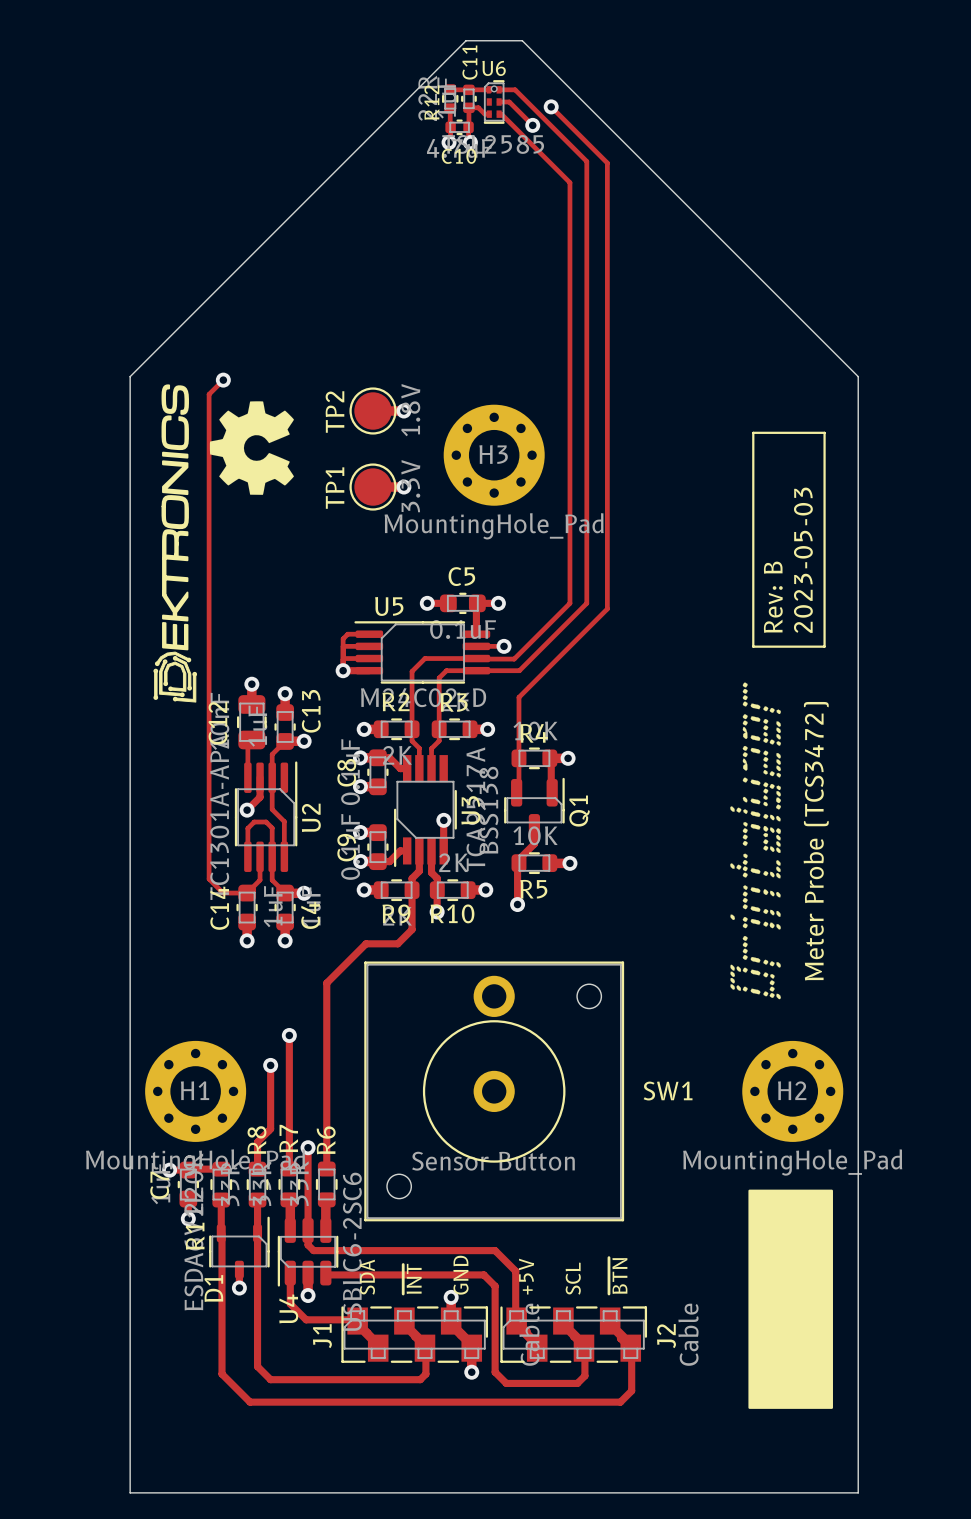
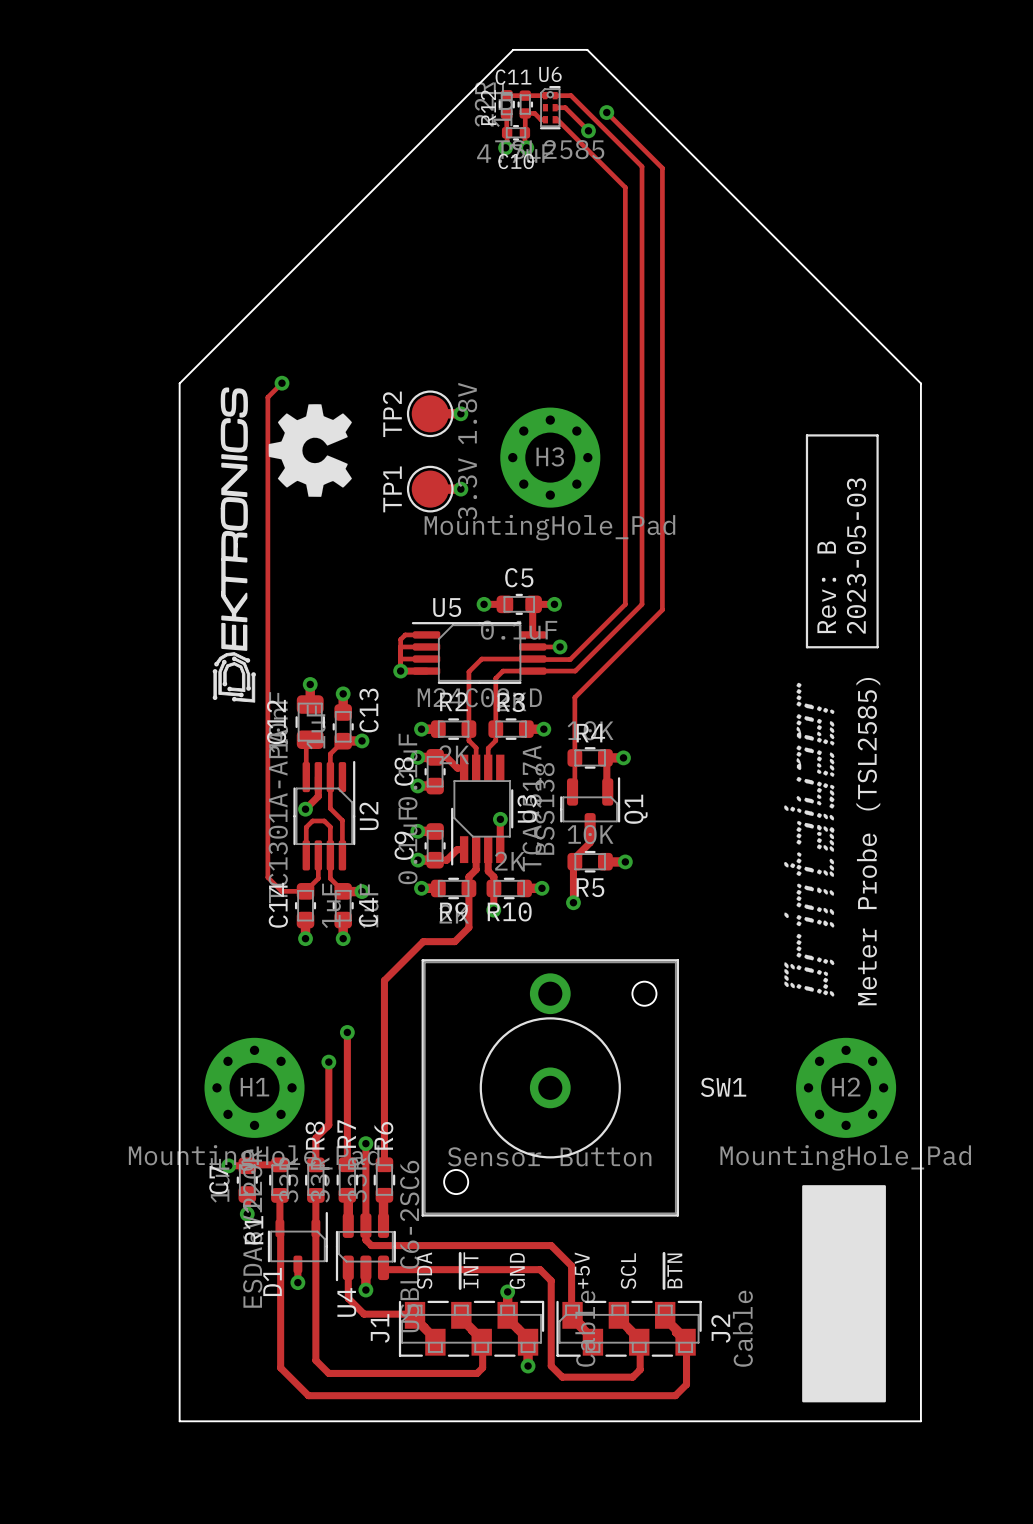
board edge: (466, 40) (130, 376) (130, 1492) (858, 1492) (858, 376) (522, 40) (466, 40) -> (513, 49) (179, 383) (179, 1421) (920, 1421) (920, 383) (587, 49) (513, 49)
C11 name rotation: 0° (469, 62) -> 90° clockwise (513, 77)
text: Meter Probe (TCS3472) (816, 841) -> Meter Probe (TSL2585) (868, 841)

